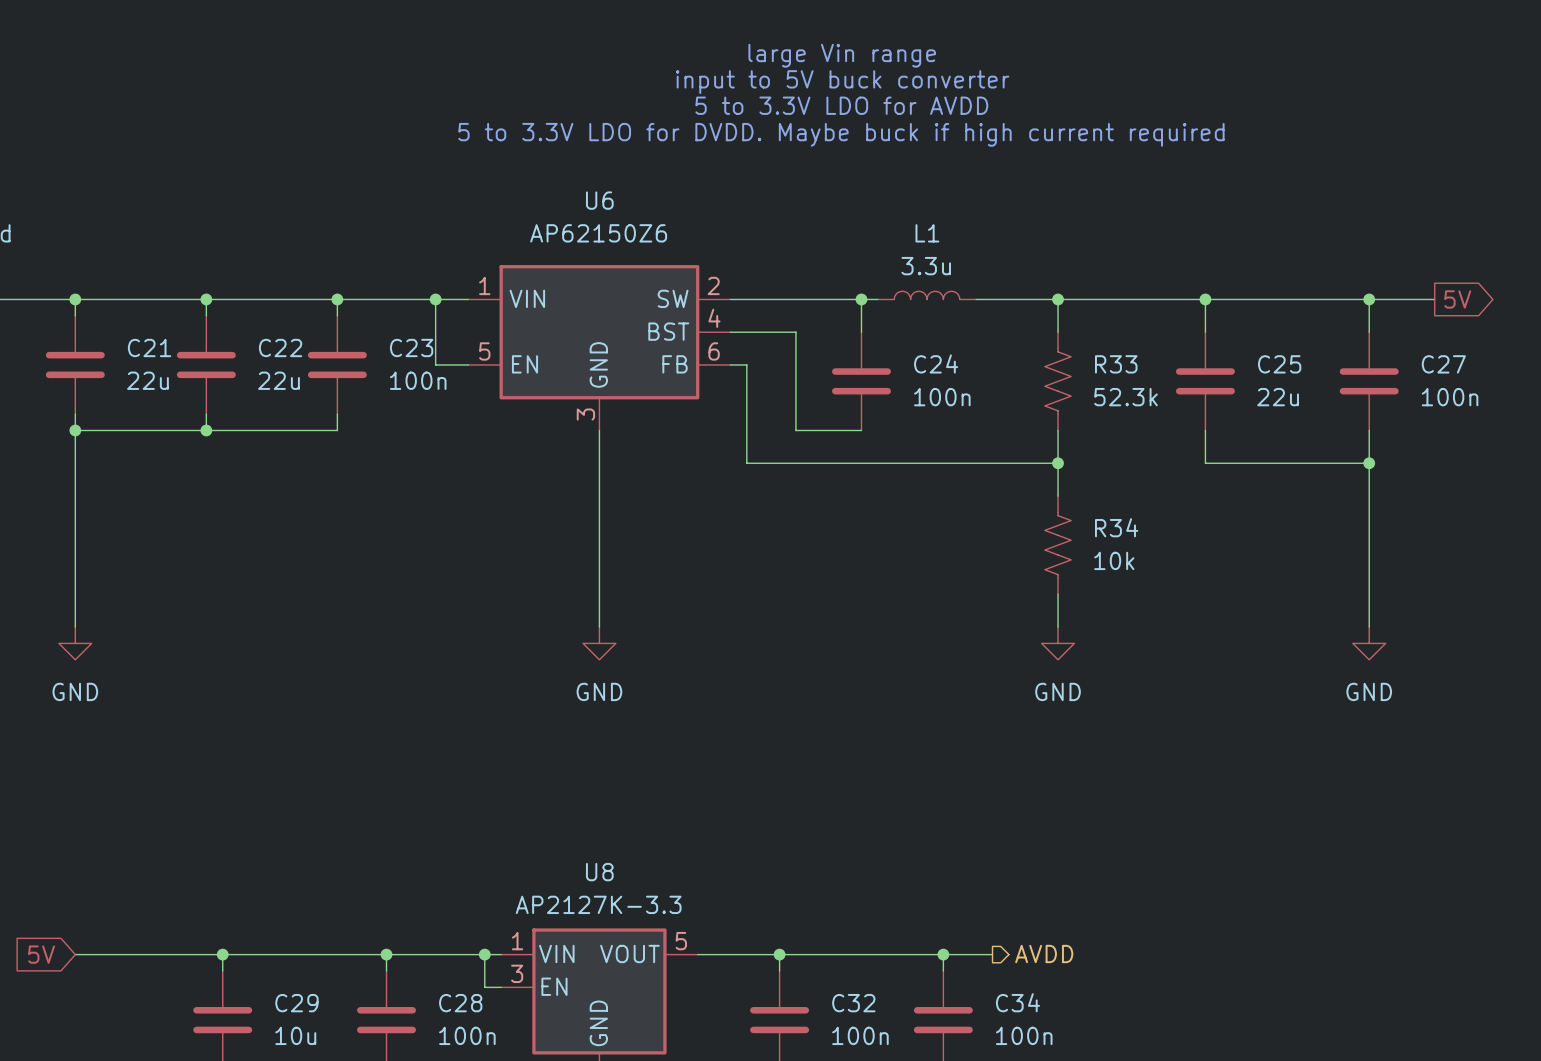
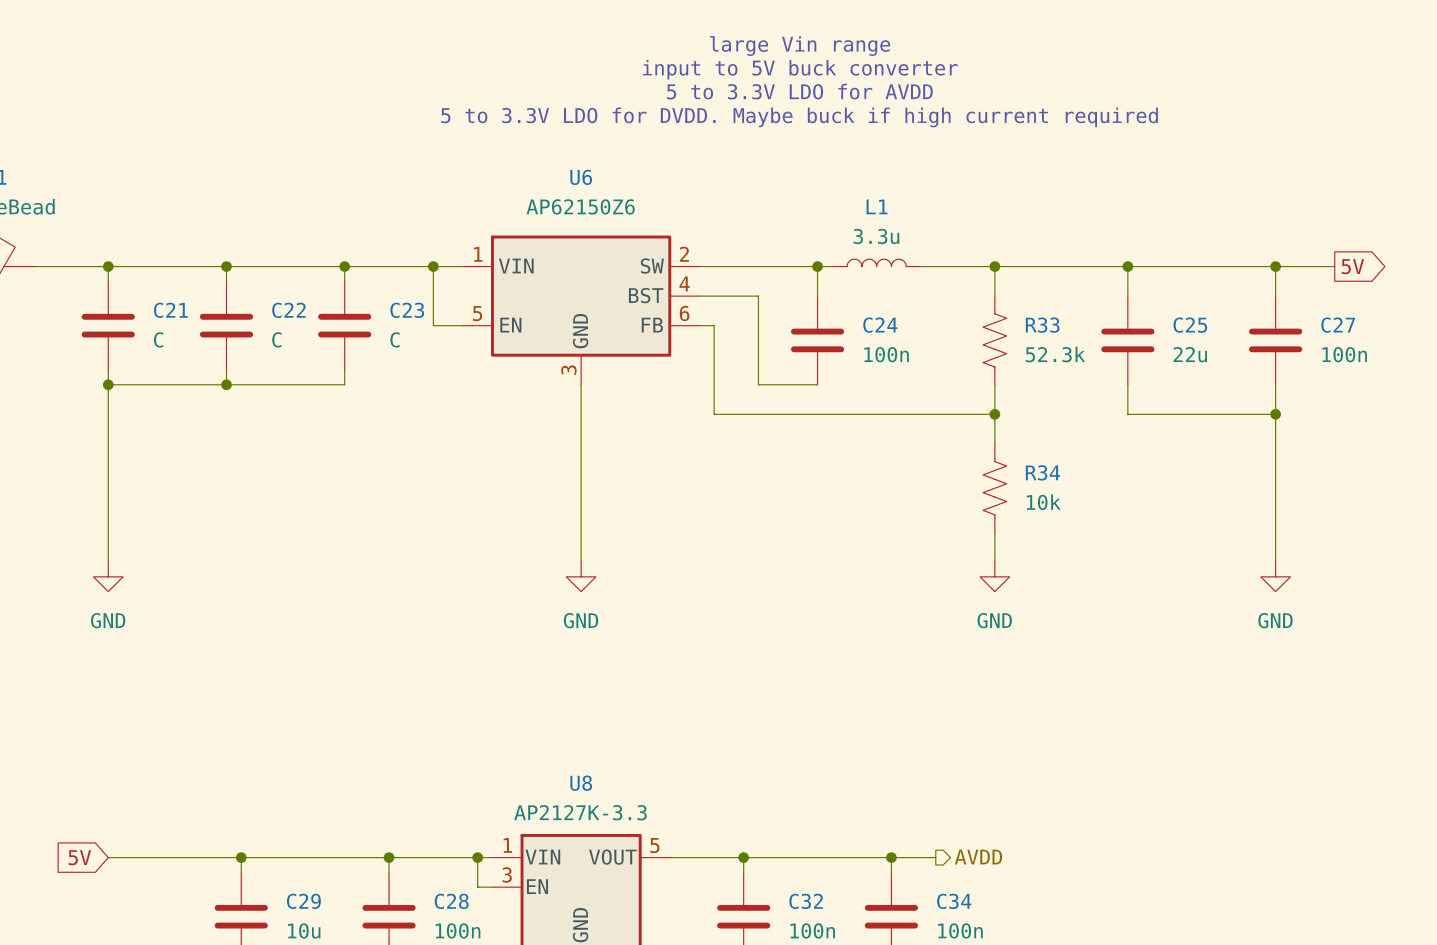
C21 value: 22u (147, 380) -> C (158, 339)
C22 value: 22u (279, 380) -> C (276, 339)
C23 value: 100n (418, 380) -> C (395, 339)

